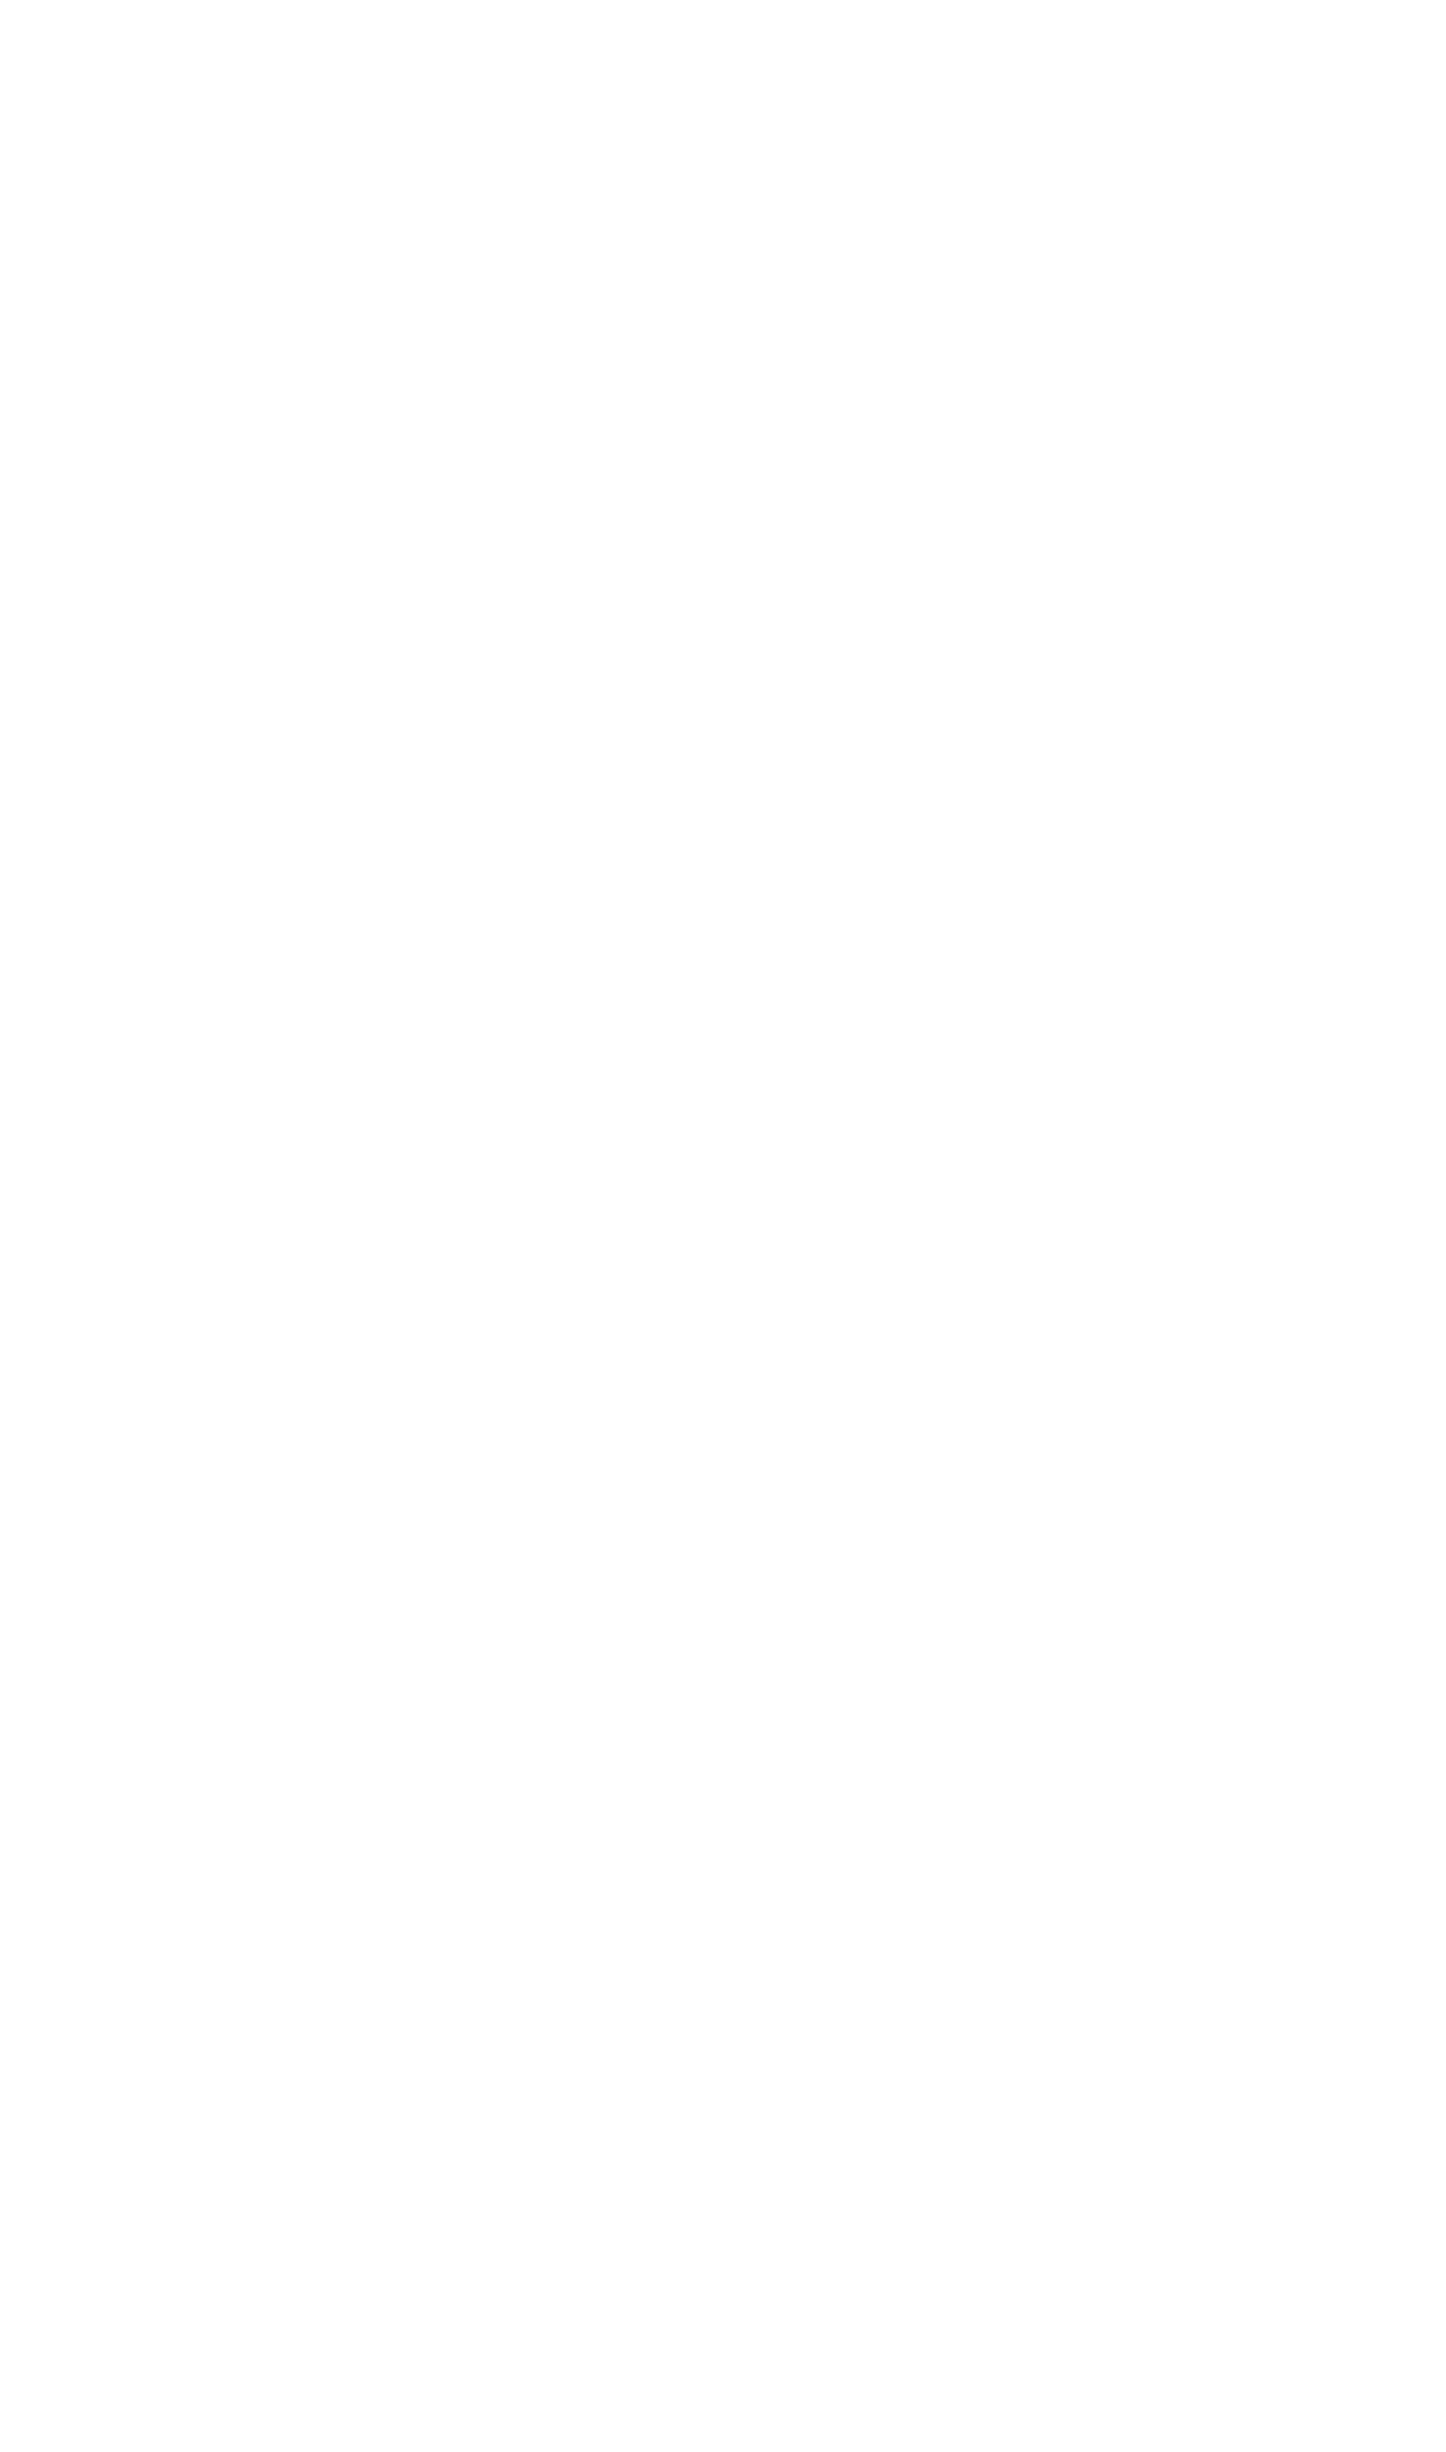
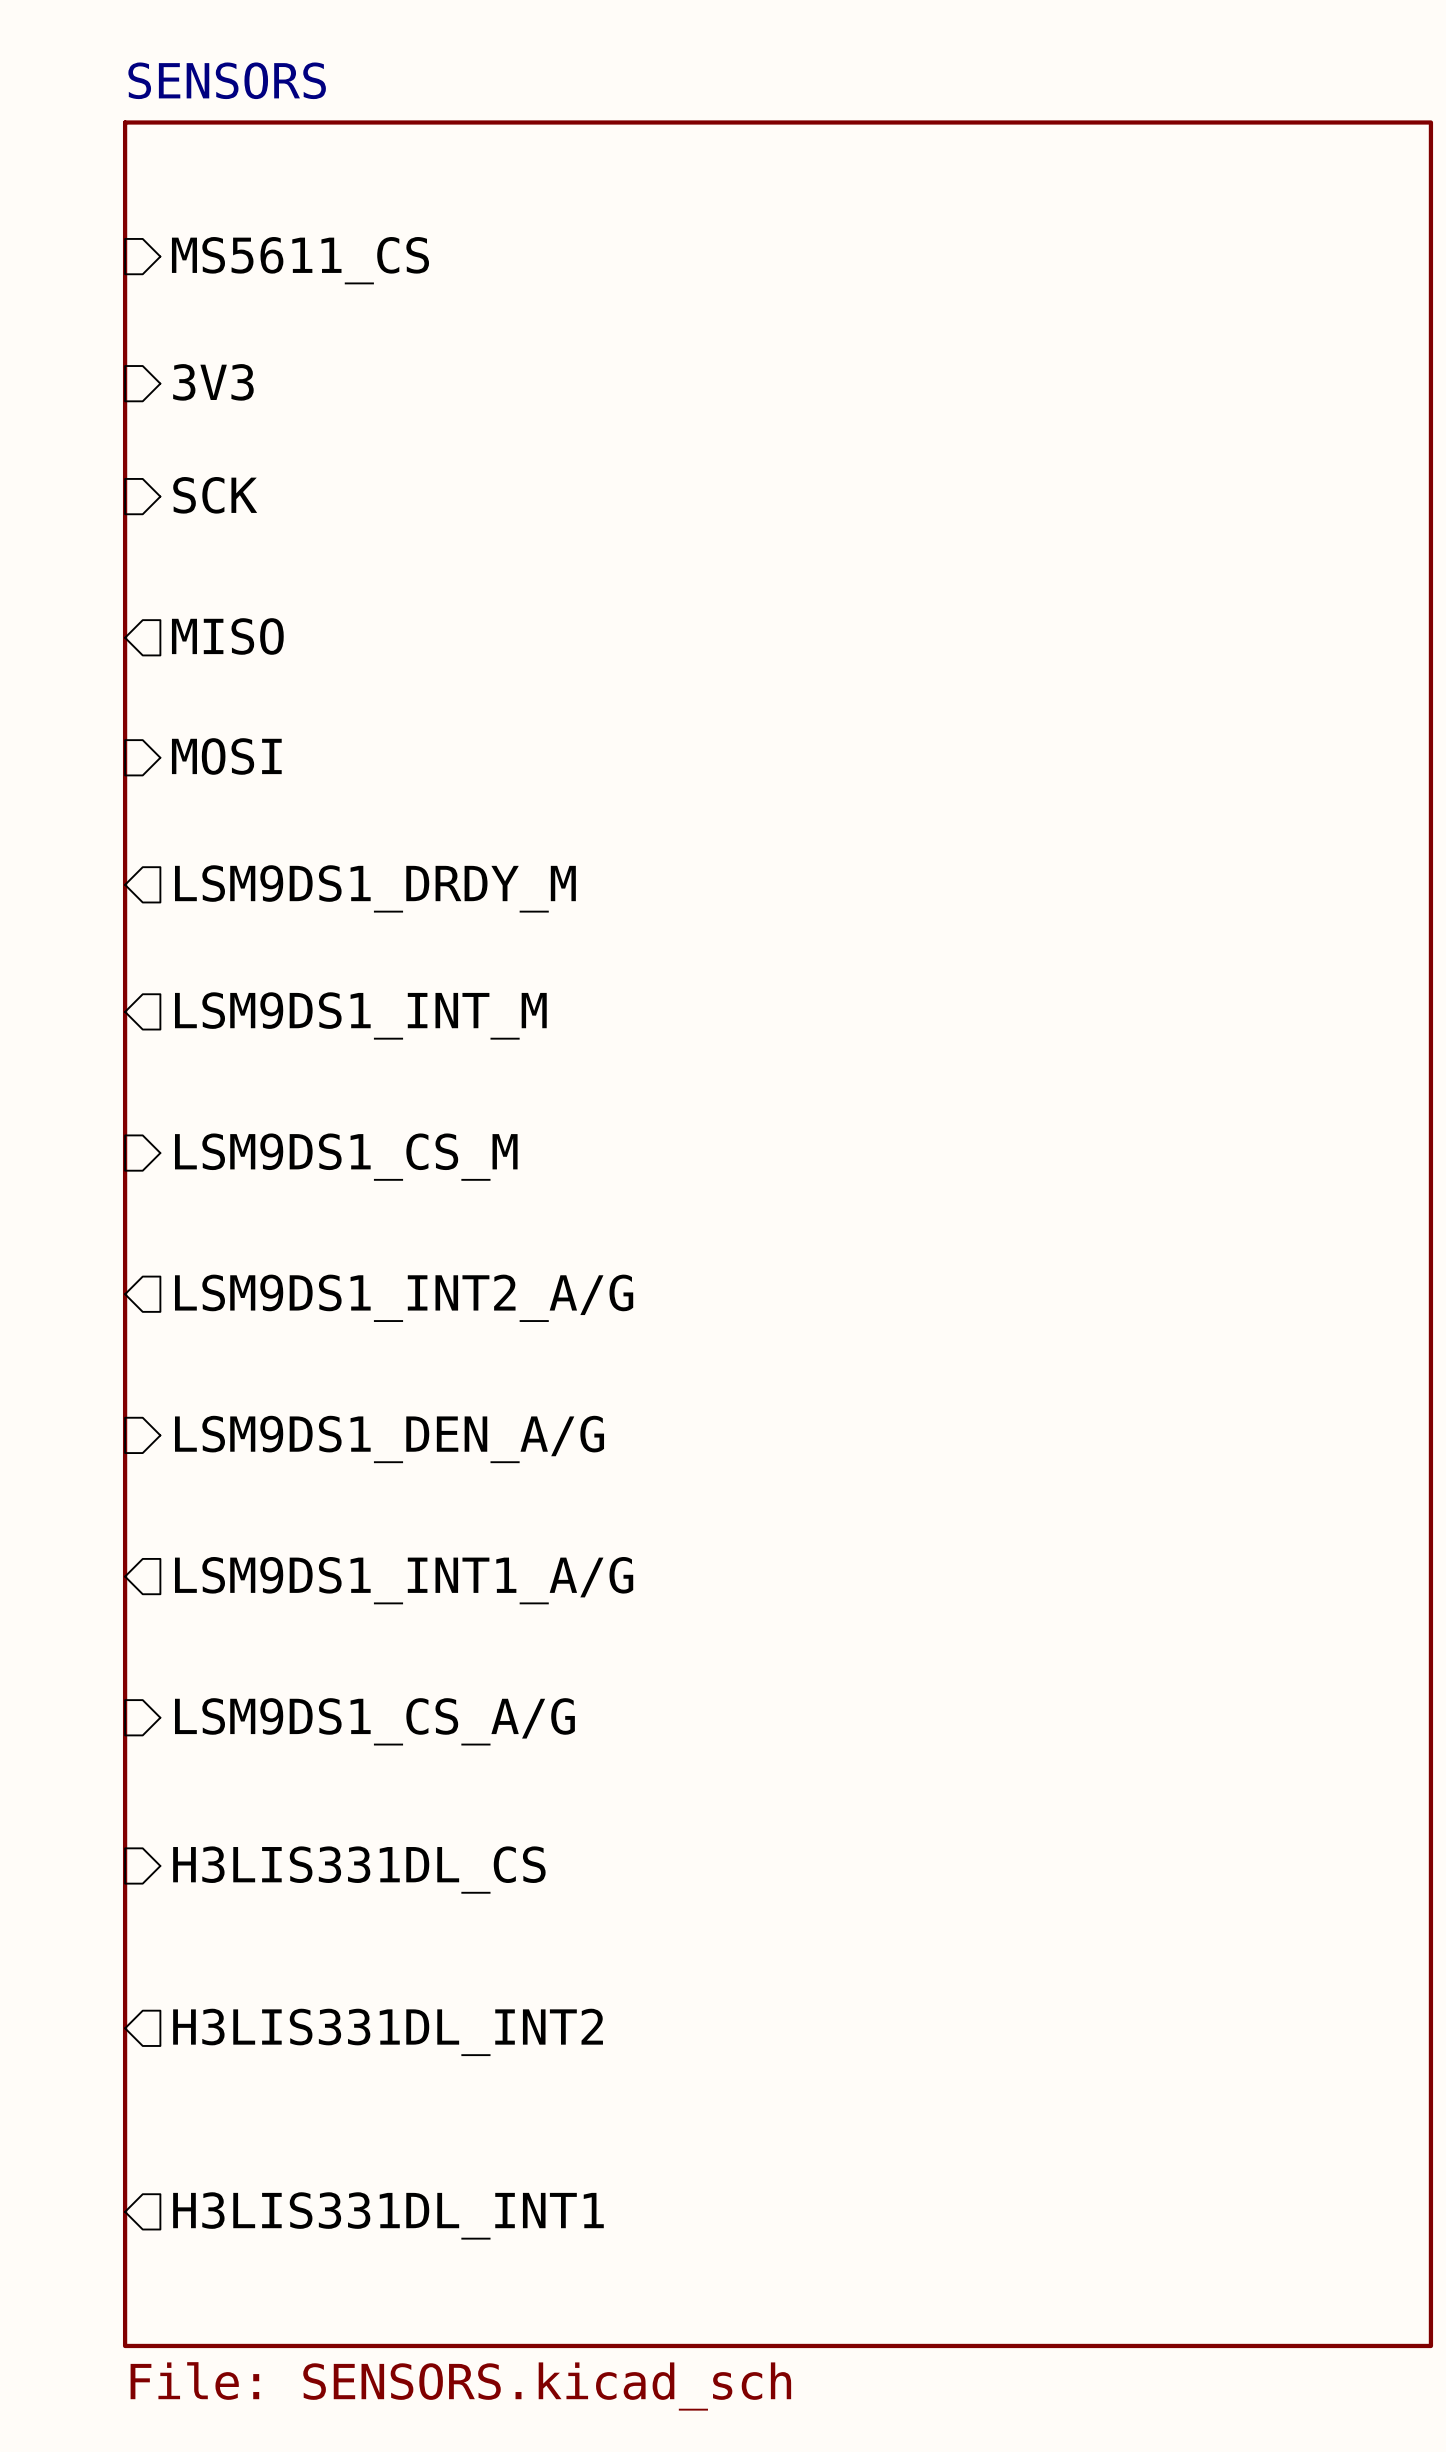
sheet pin: none -> MS5611_CS (300, 260)
sheet pin: none -> 3V3 (213, 382)
sheet pin: none -> SCK (215, 495)
sheet pin: none -> MISO (227, 636)
sheet pin: none -> MOSI (226, 756)
sheet pin: none -> LSM9DS1_DRDY_M (375, 888)
sheet pin: none -> LSM9DS1_INT_M (360, 1015)
sheet pin: none -> LSM9DS1_CS_M (346, 1157)
sheet SENSORS: none -> File: SENSORS.kicad_sch (778, 1234)
sheet pin: none -> LSM9DS1_INT2_A/G (404, 1298)
sheet pin: none -> LSM9DS1_DEN_A/G (389, 1439)
sheet pin: none -> LSM9DS1_INT1_A/G (404, 1580)
sheet pin: none -> LSM9DS1_CS_A/G (374, 1721)
sheet pin: none -> H3LIS331DL_CS (359, 1870)
sheet pin: none -> H3LIS331DL_INT2 (388, 2032)
sheet pin: none -> H3LIS331DL_INT1 (388, 2215)

